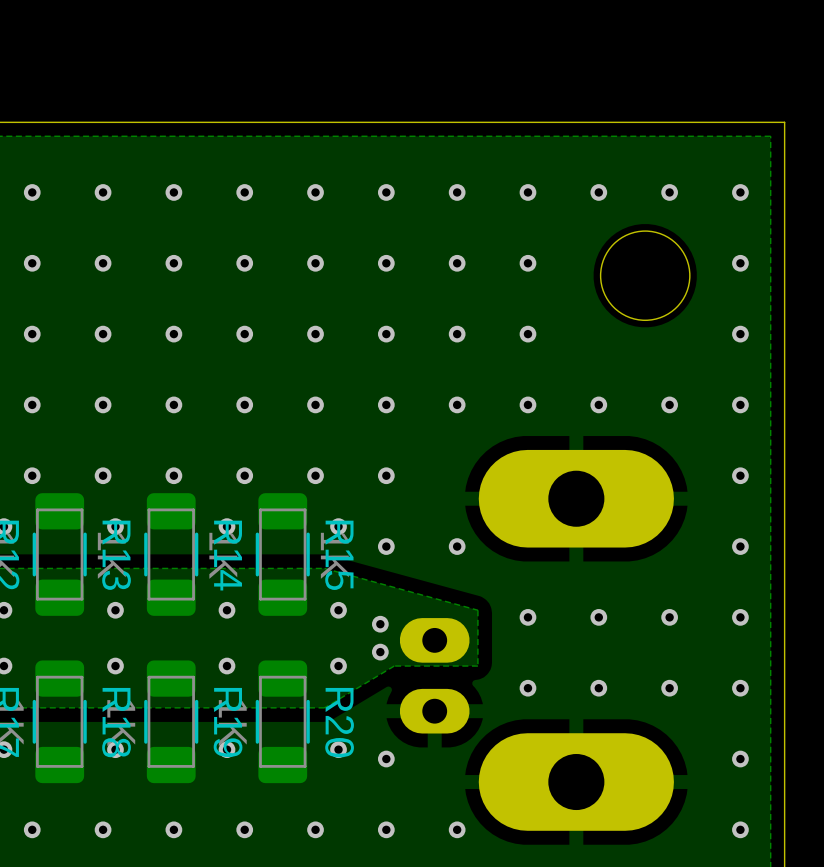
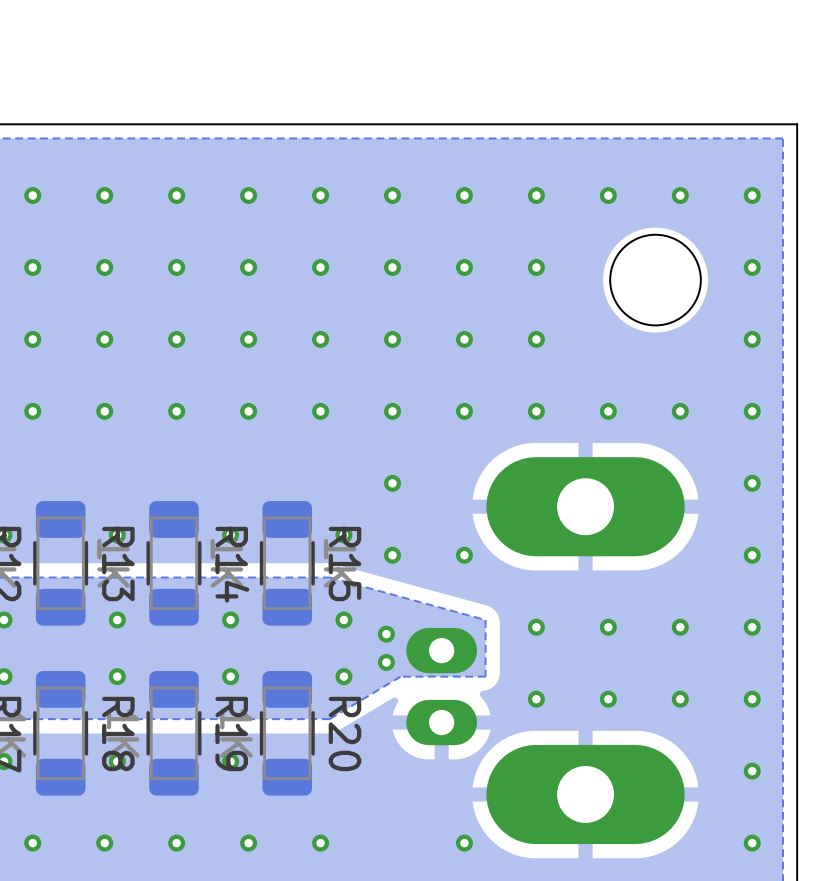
via: (32, 475) -> none
via: (103, 475) -> none
via: (173, 475) -> none
via: (244, 475) -> none
via: (315, 475) -> none
via: (338, 749) -> none
via: (386, 759) -> none
via: (386, 829) -> none

